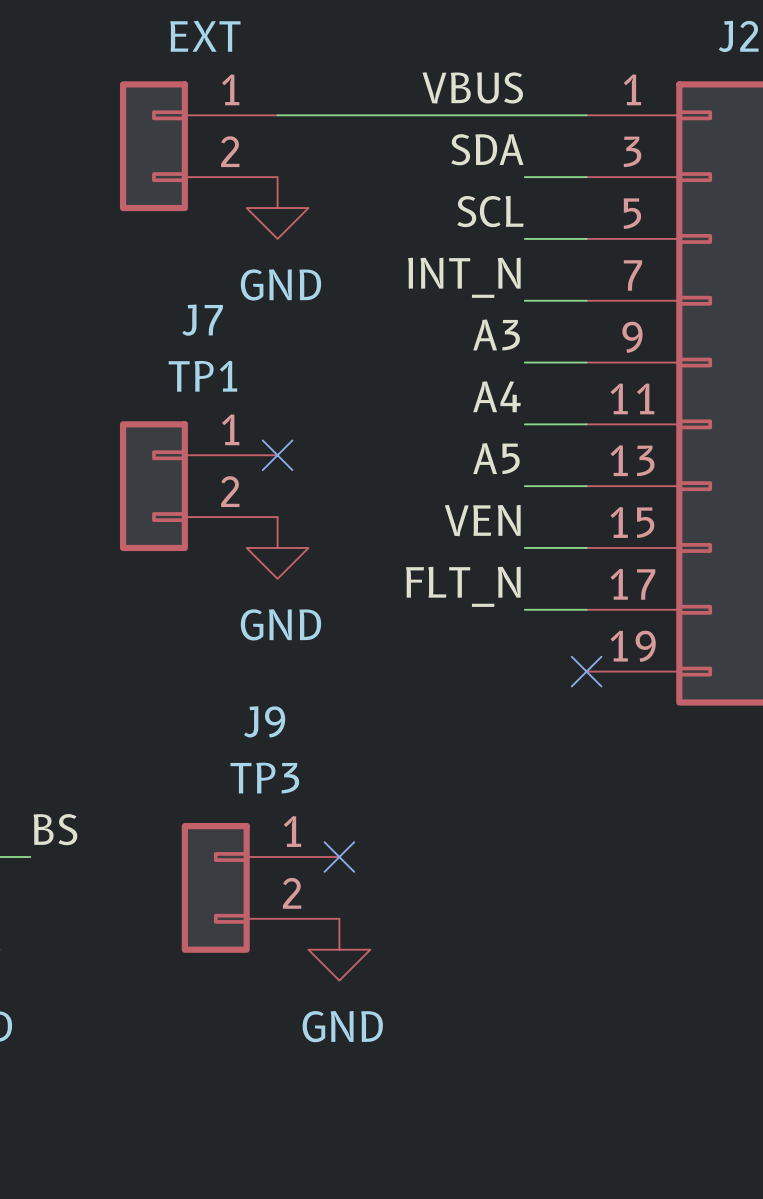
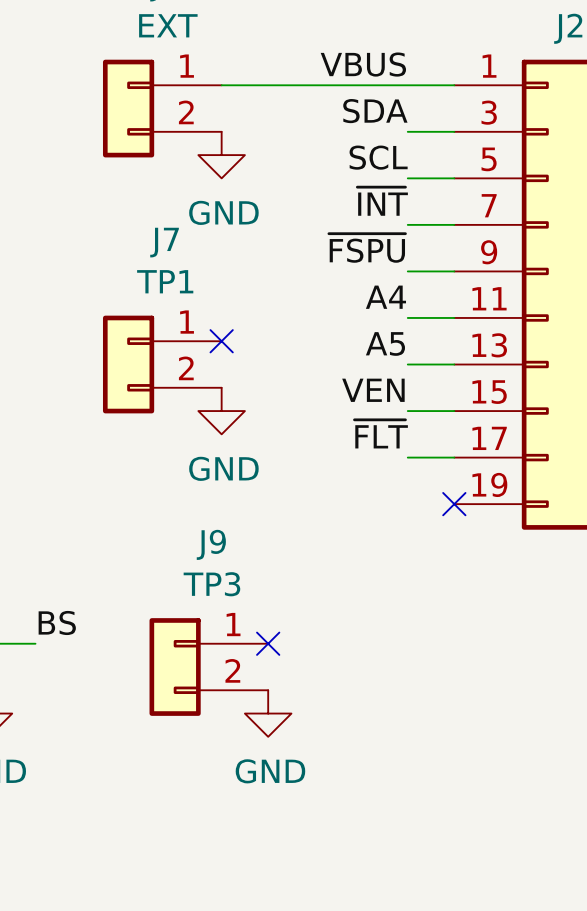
label: INT_N (464, 277) -> ~{INT} (382, 201)
label: A3 (496, 334) -> ~{FSPU} (367, 248)
label: FLT_N (463, 586) -> ~{FLT} (381, 434)

